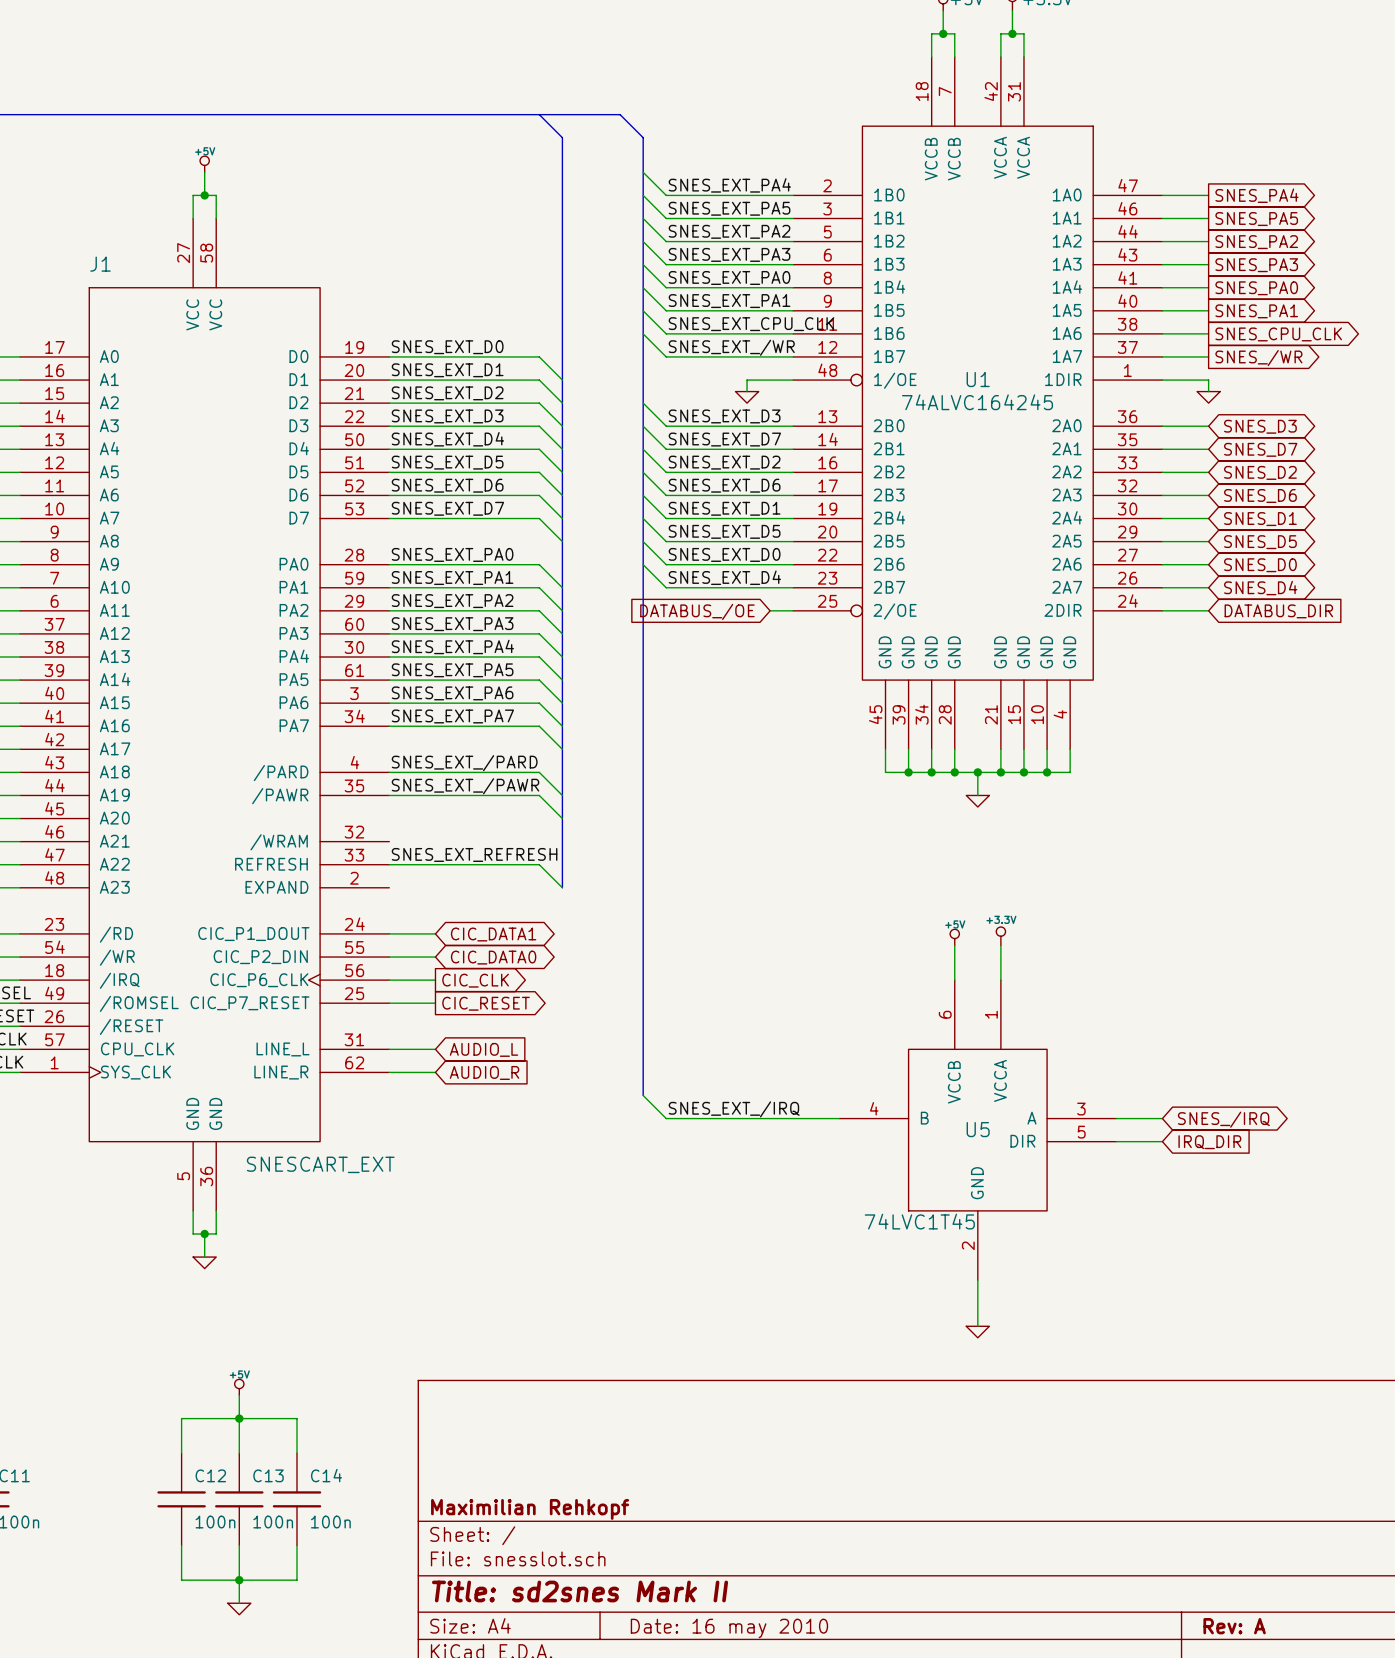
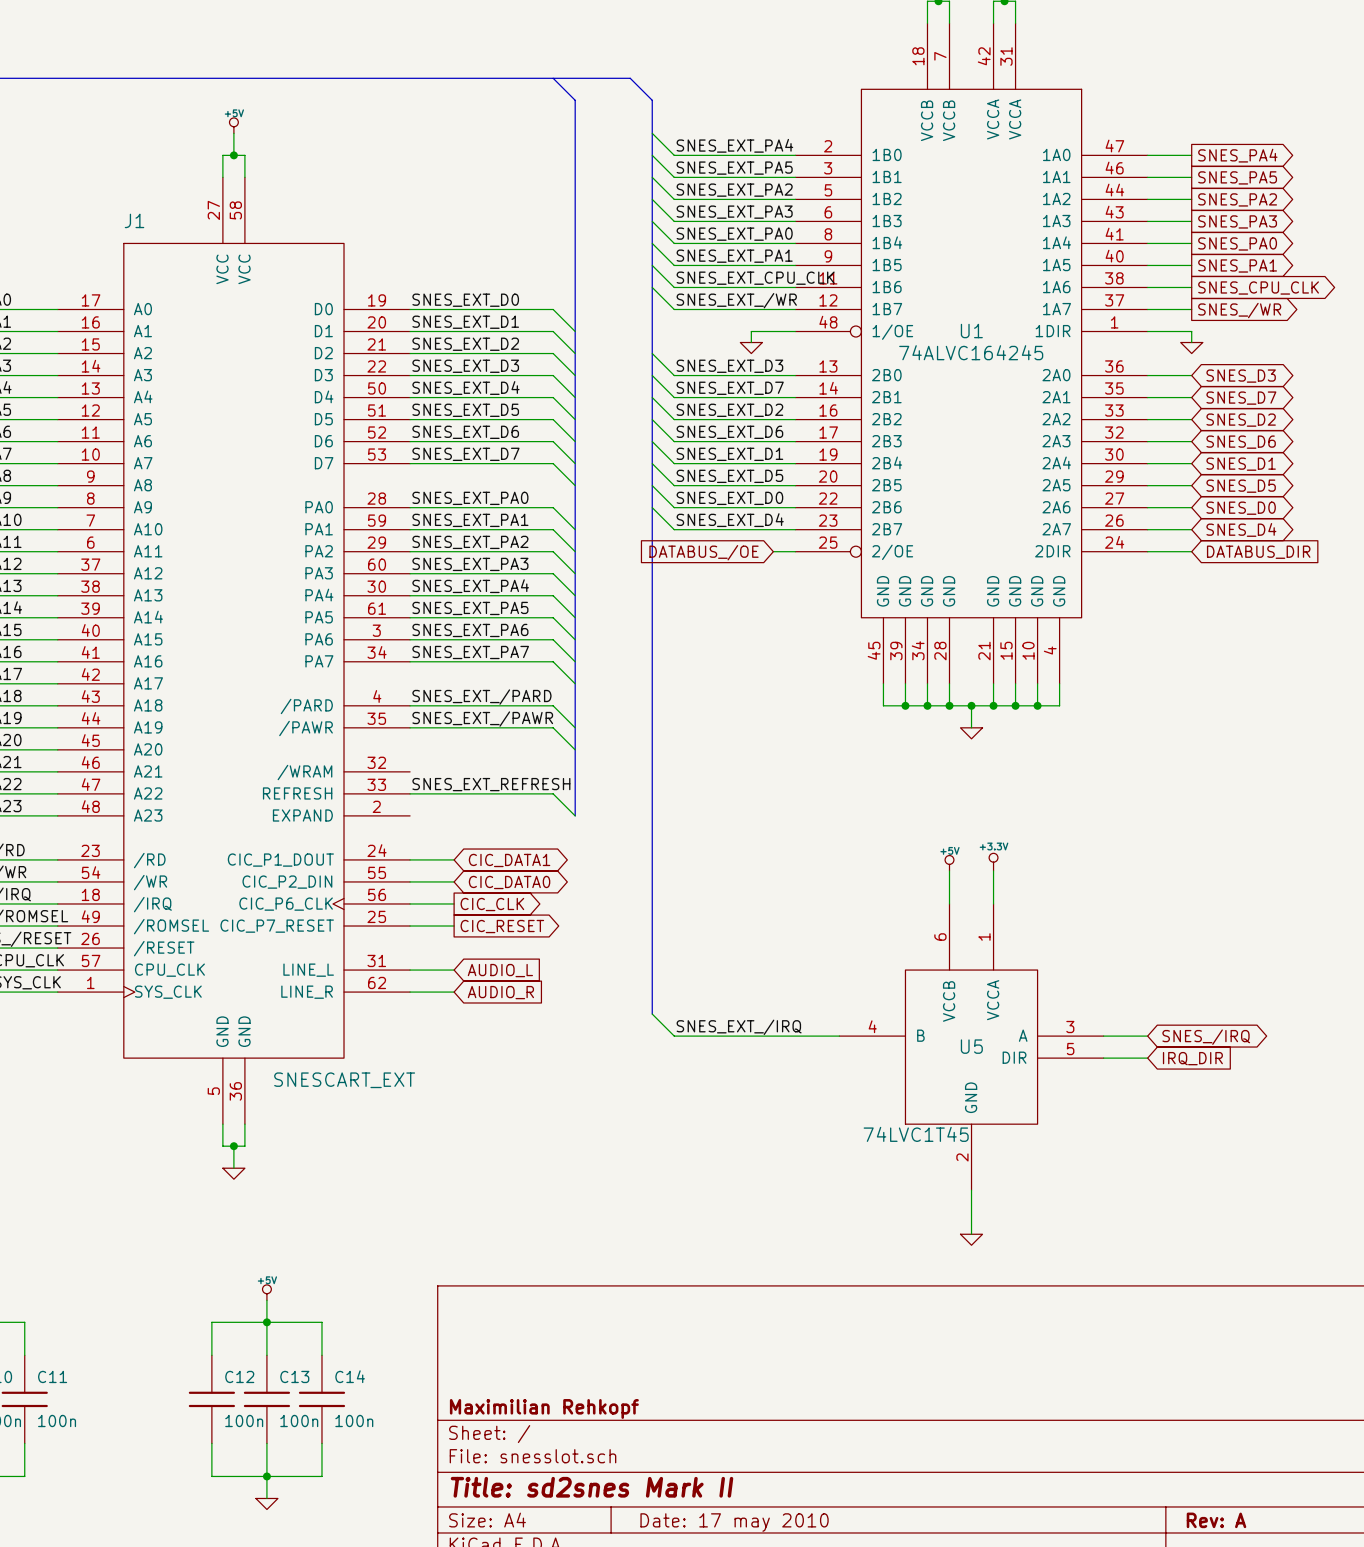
title block: Date: 16 may 2010 (729, 1628) -> Date: 17 may 2010 (734, 1522)

